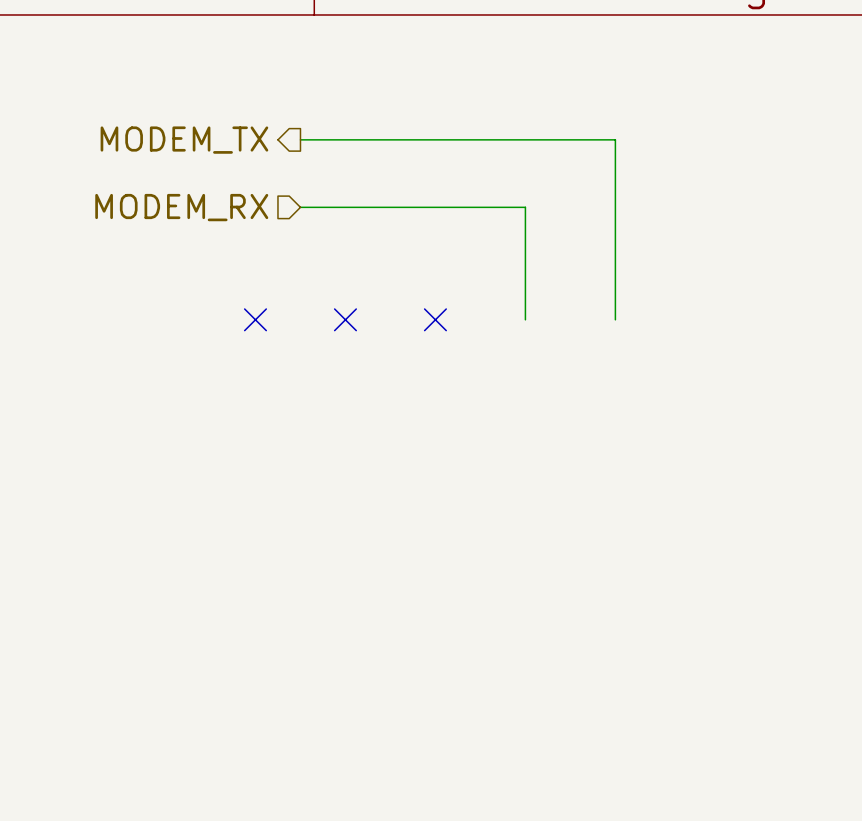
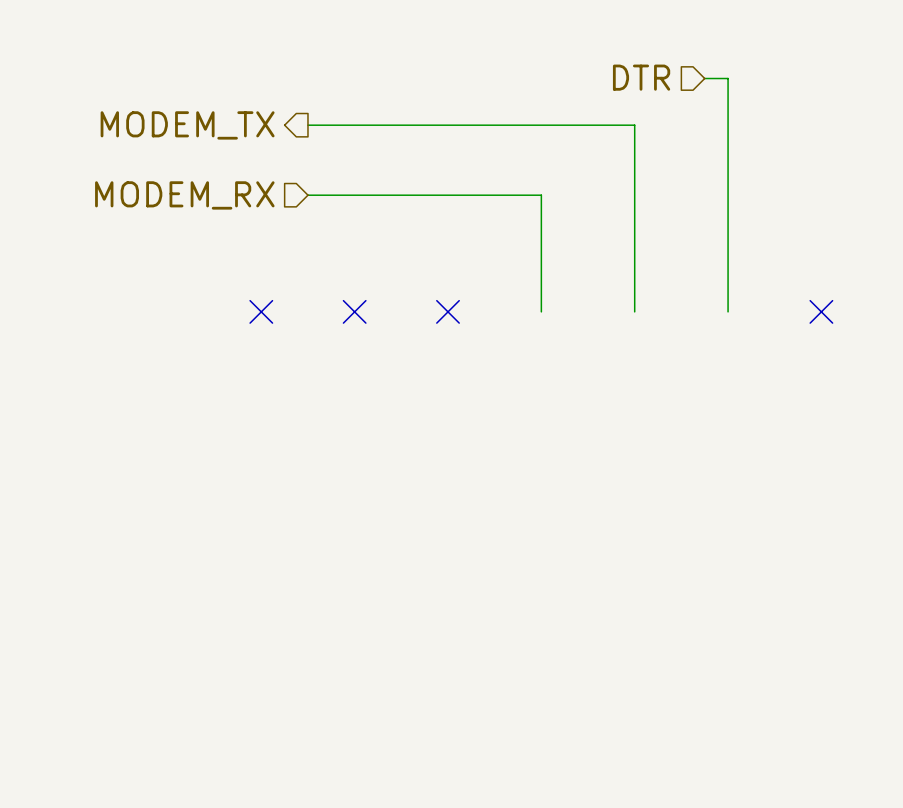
hierarchical label: none -> DTR (641, 77)
wire: none -> (704, 78) (728, 78) (728, 311)
no-connect mark: none -> (821, 311)

